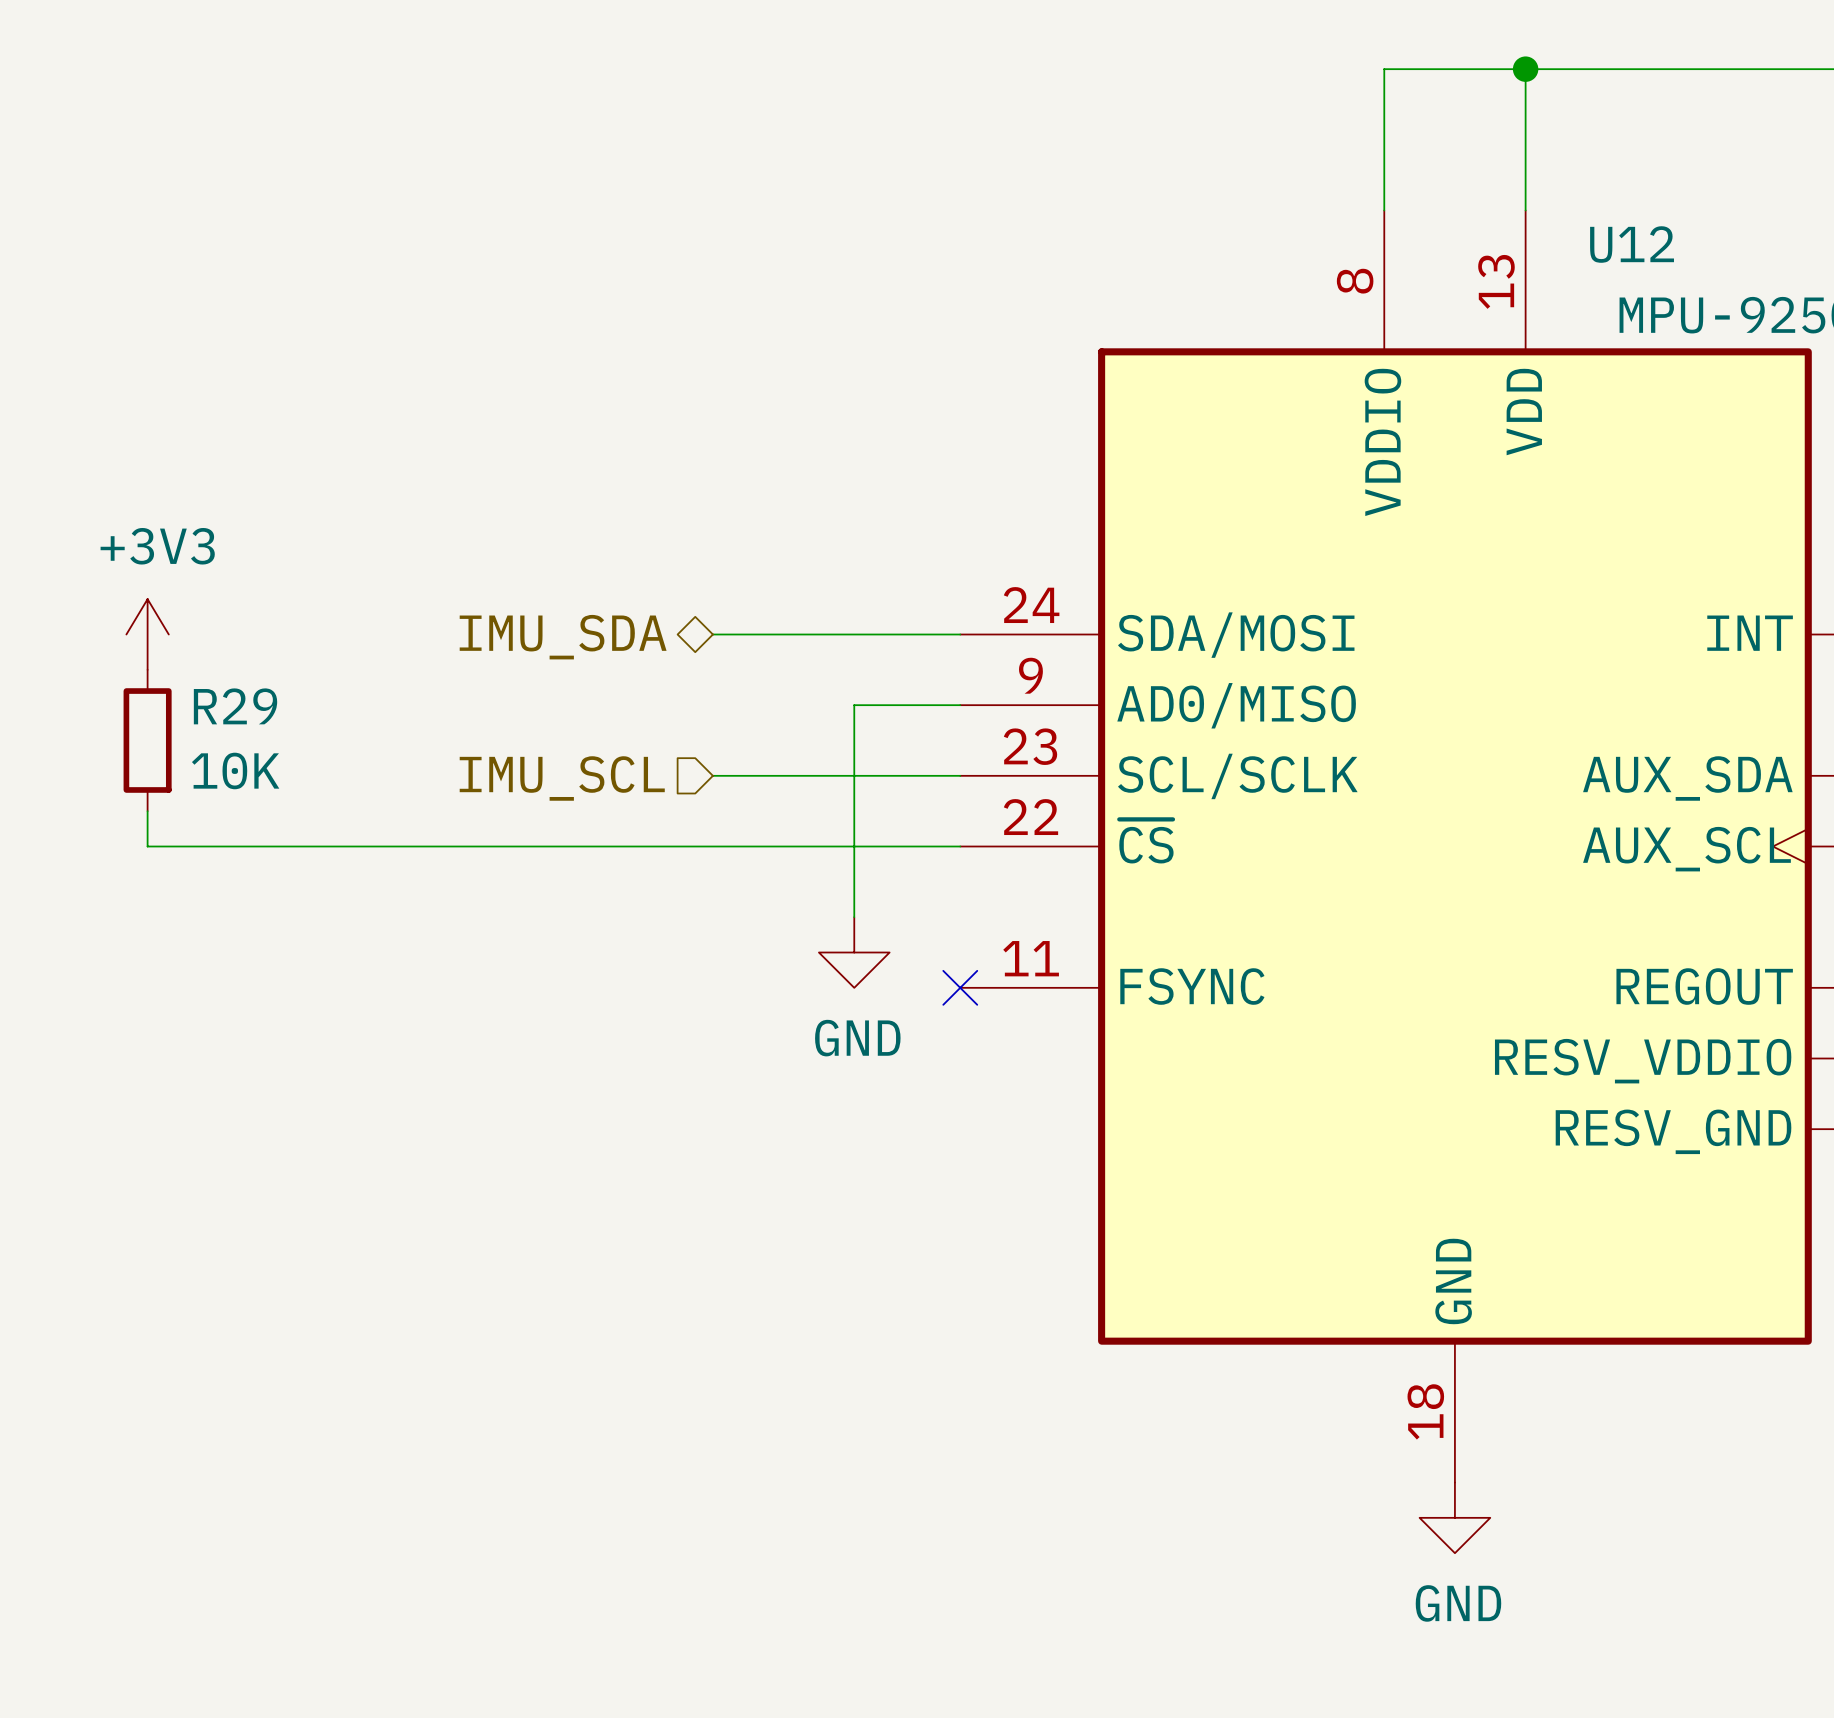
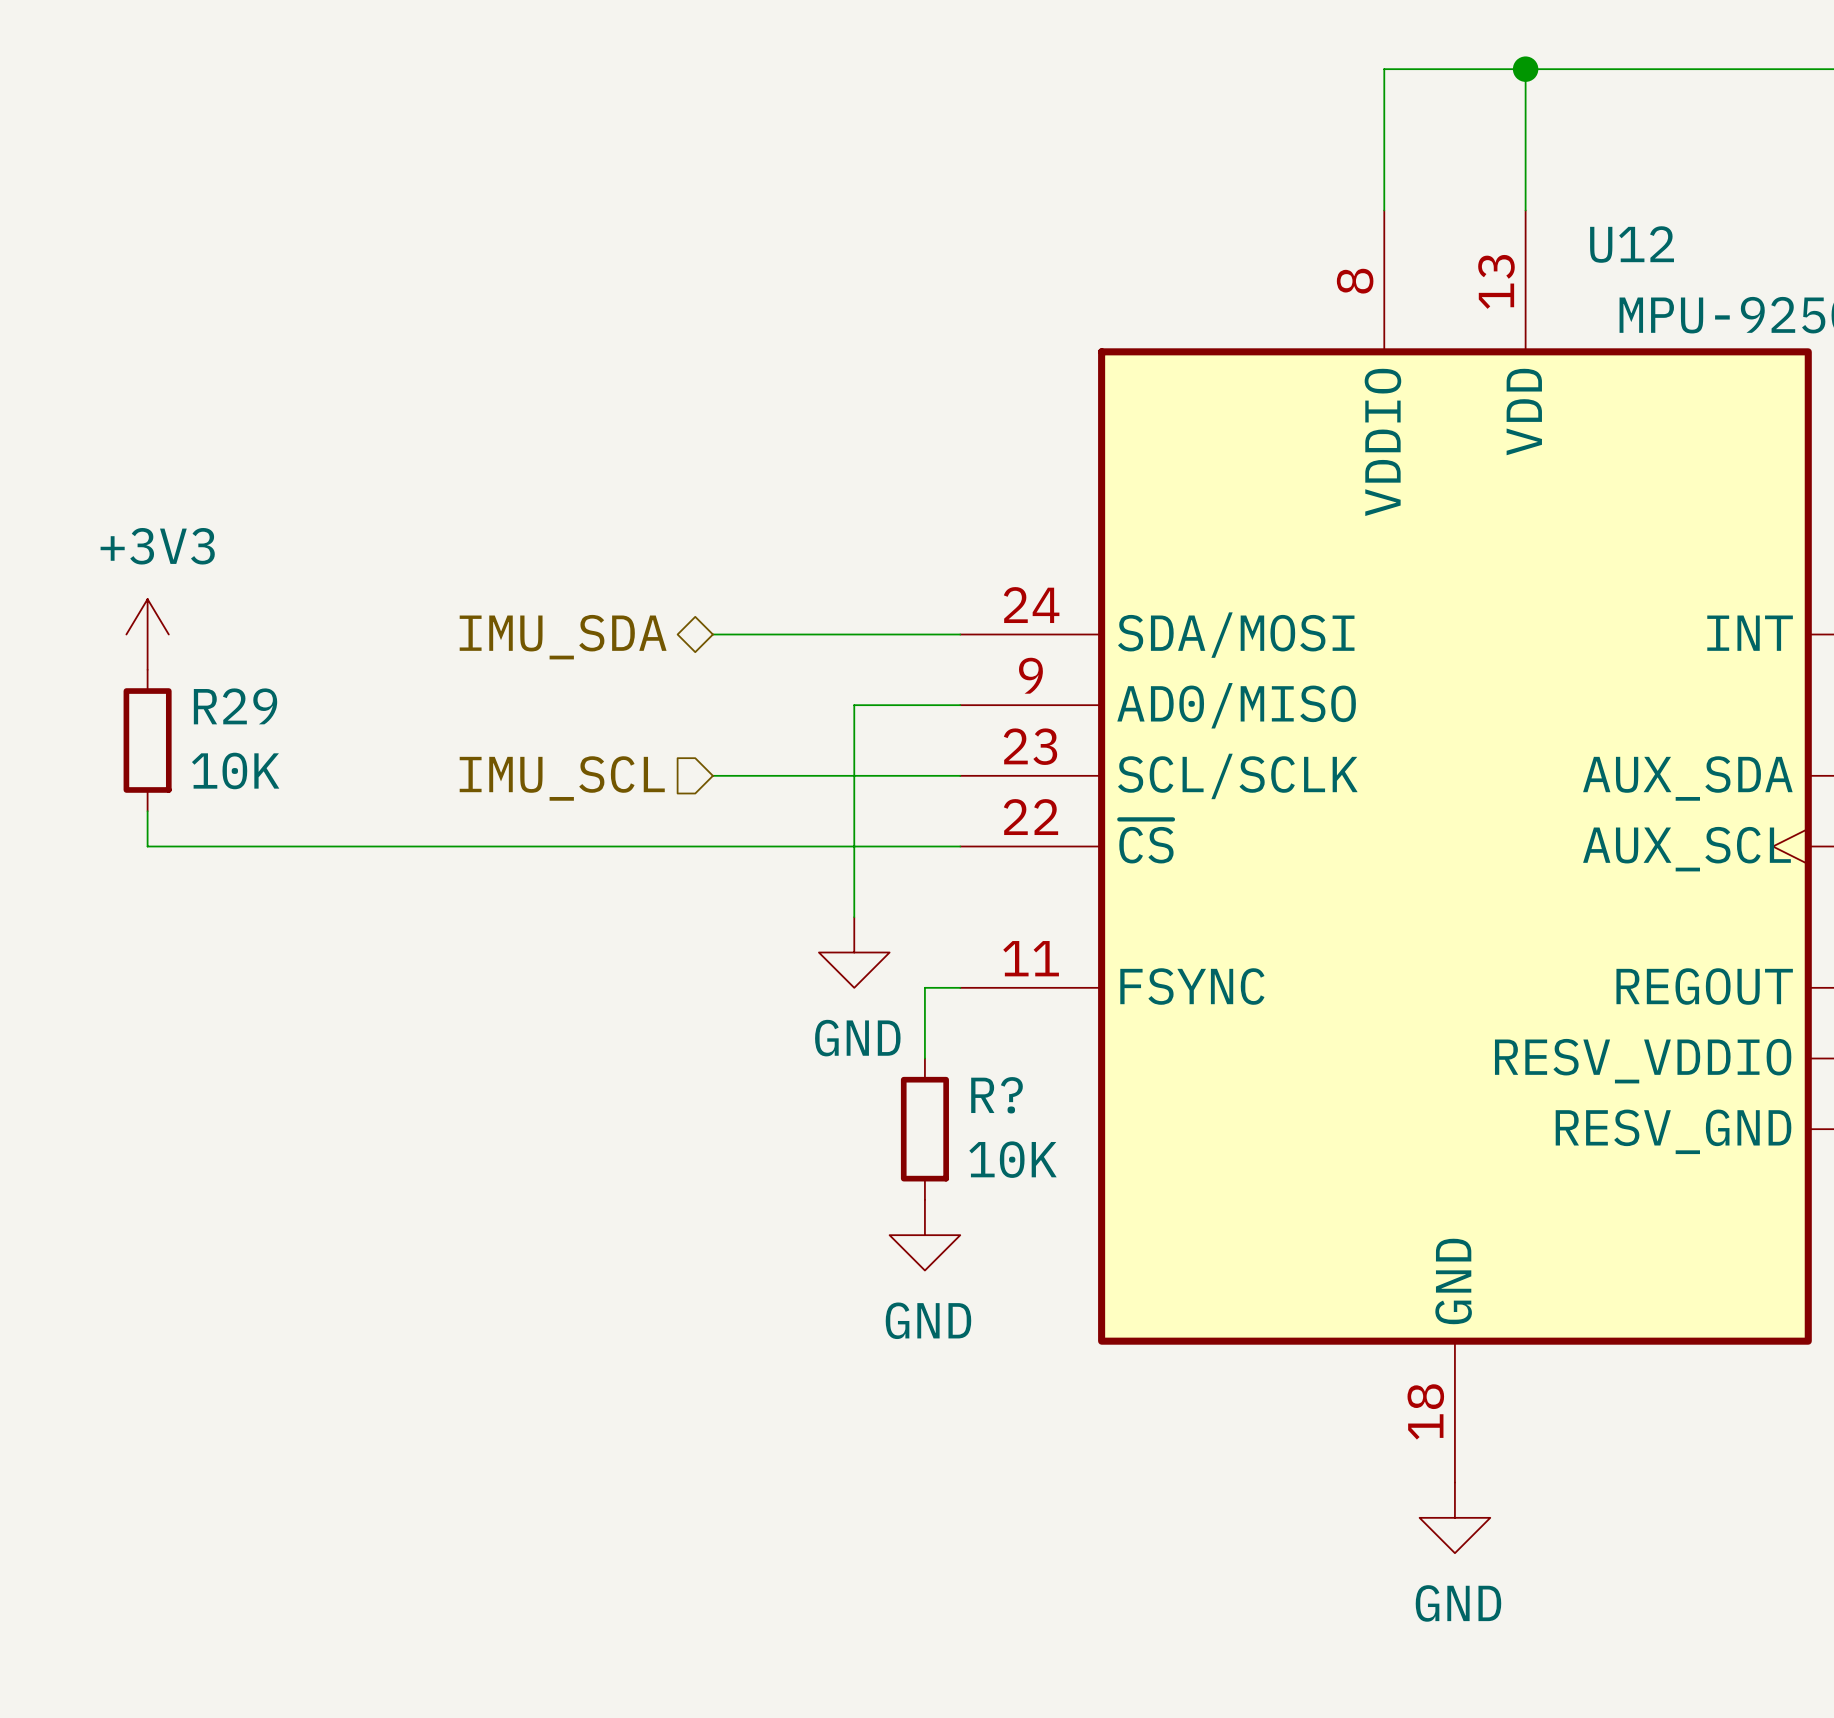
wire: none -> (960, 987) (924, 987) (924, 1058)
no-connect mark: (960, 987) -> none
R?: none -> 10K (924, 1129)
power symbol: none -> GND (924, 1235)

